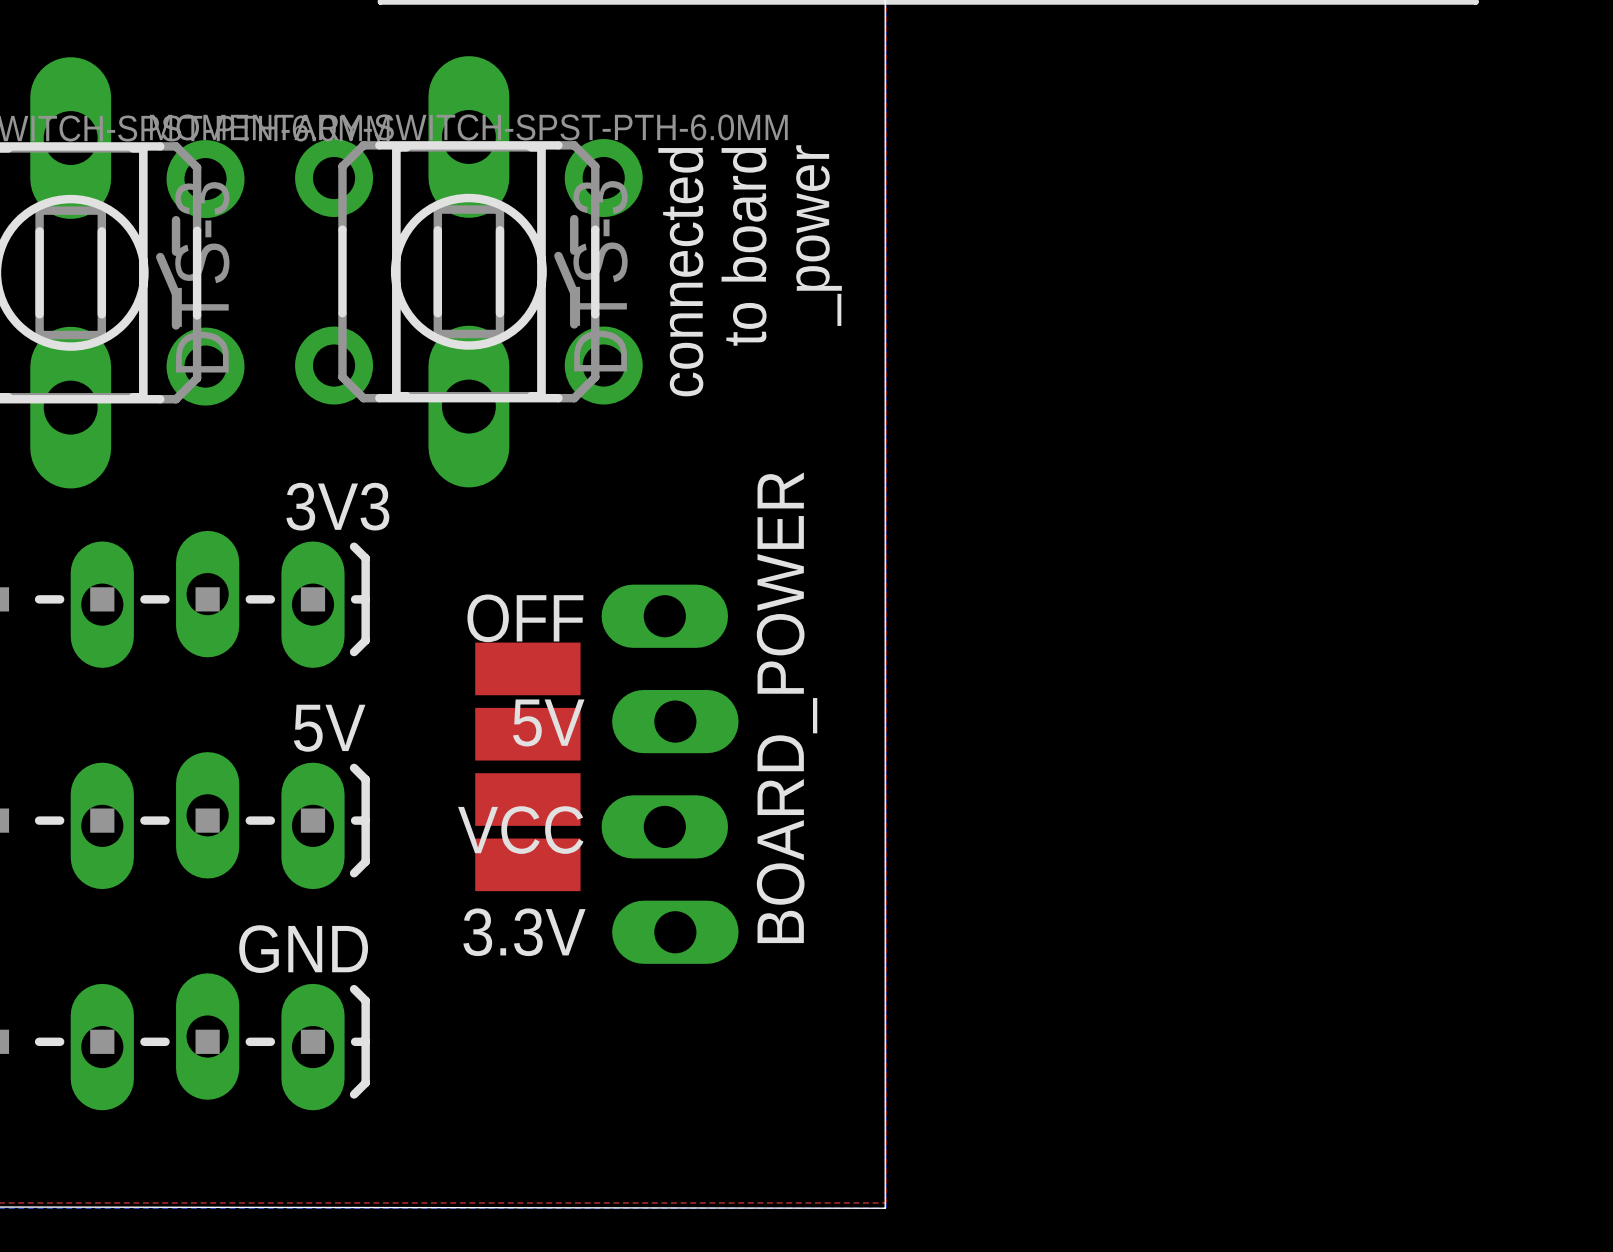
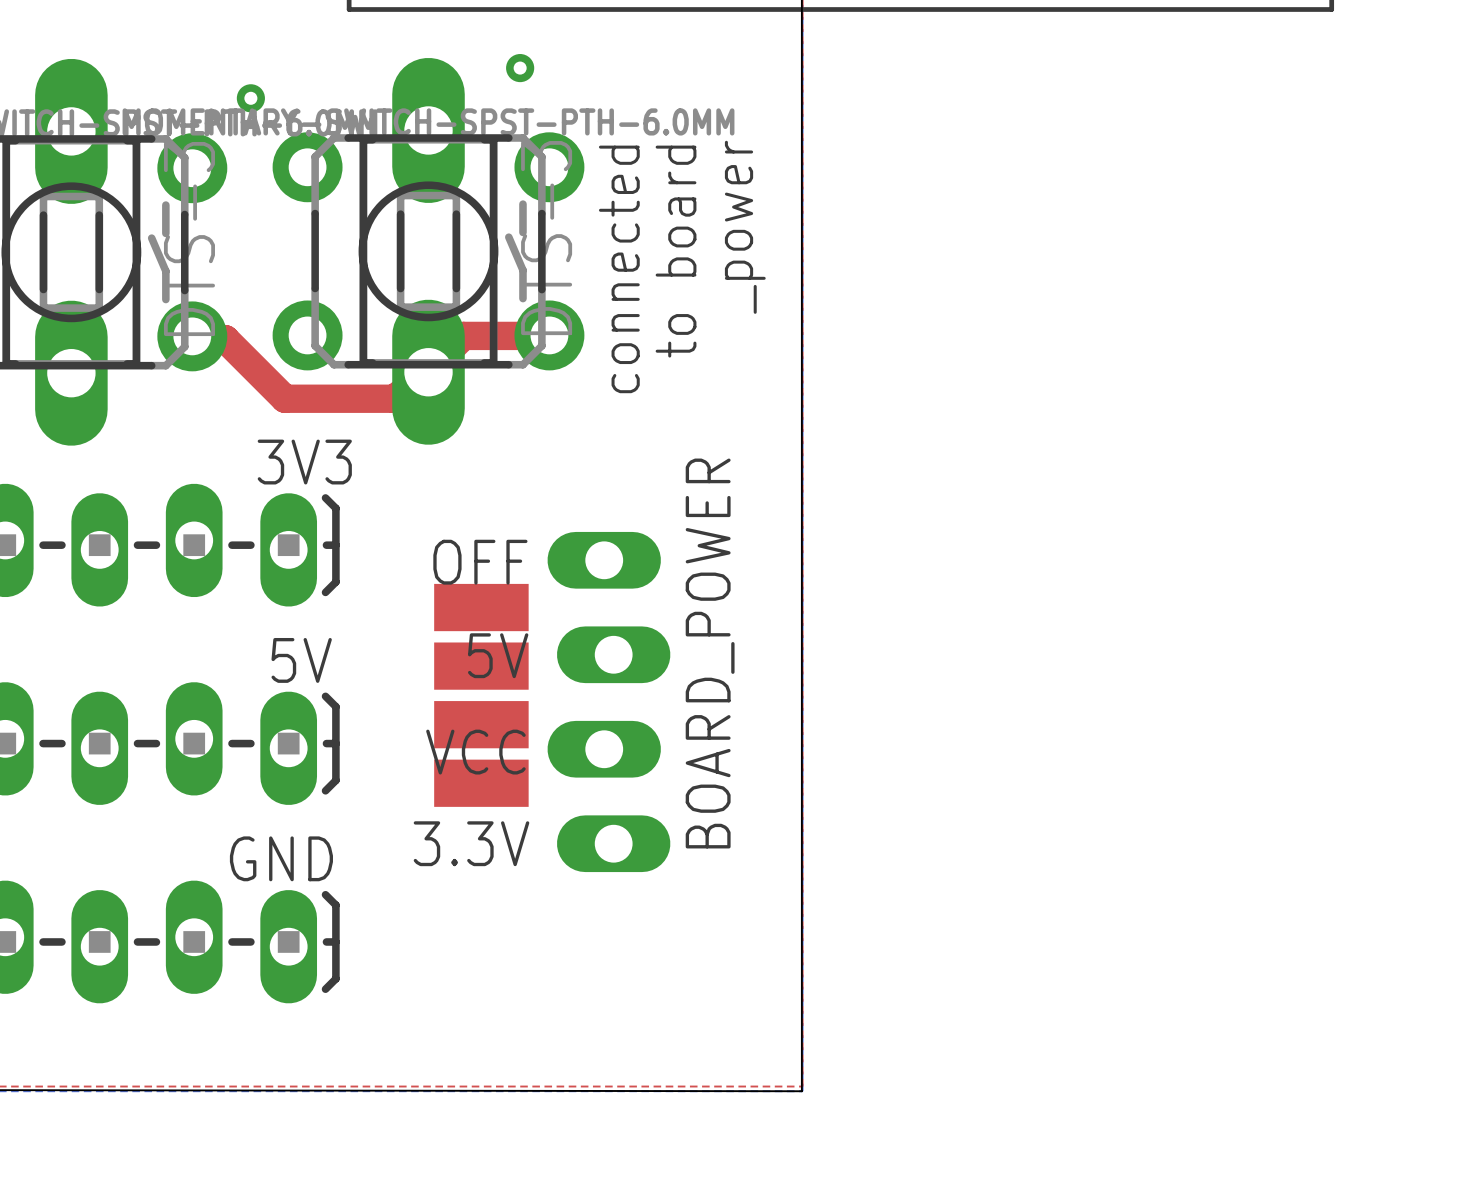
via: none -> (520, 68)
via: none -> (250, 98)
top track: none -> (549, 335) (463, 335) (428, 372) (394, 398) (284, 398) (225, 339) (192, 339) (192, 336)

